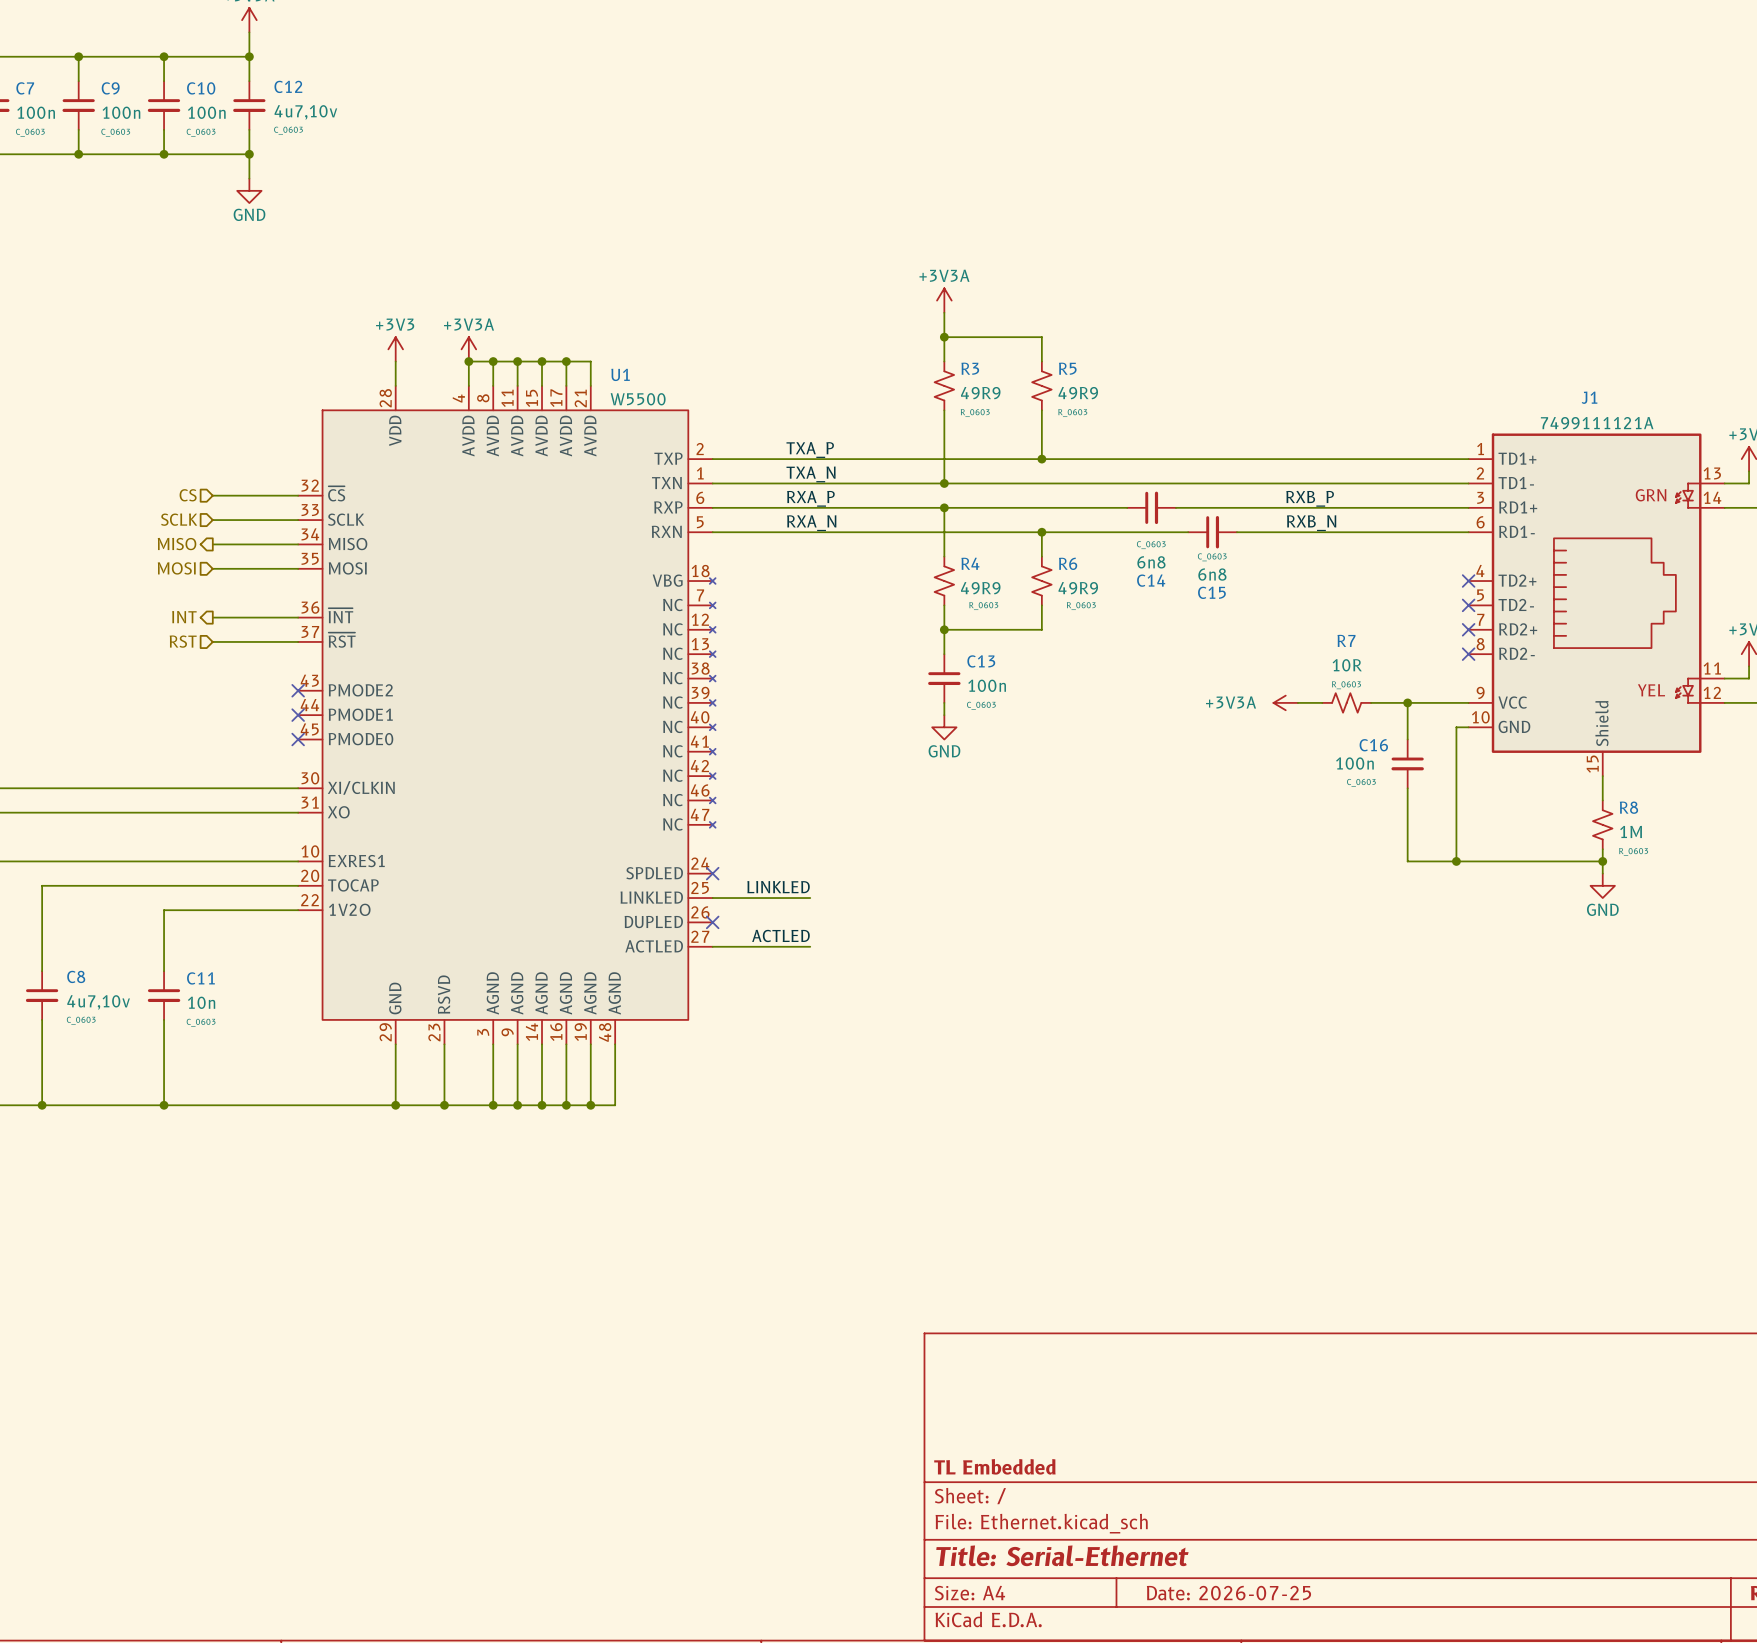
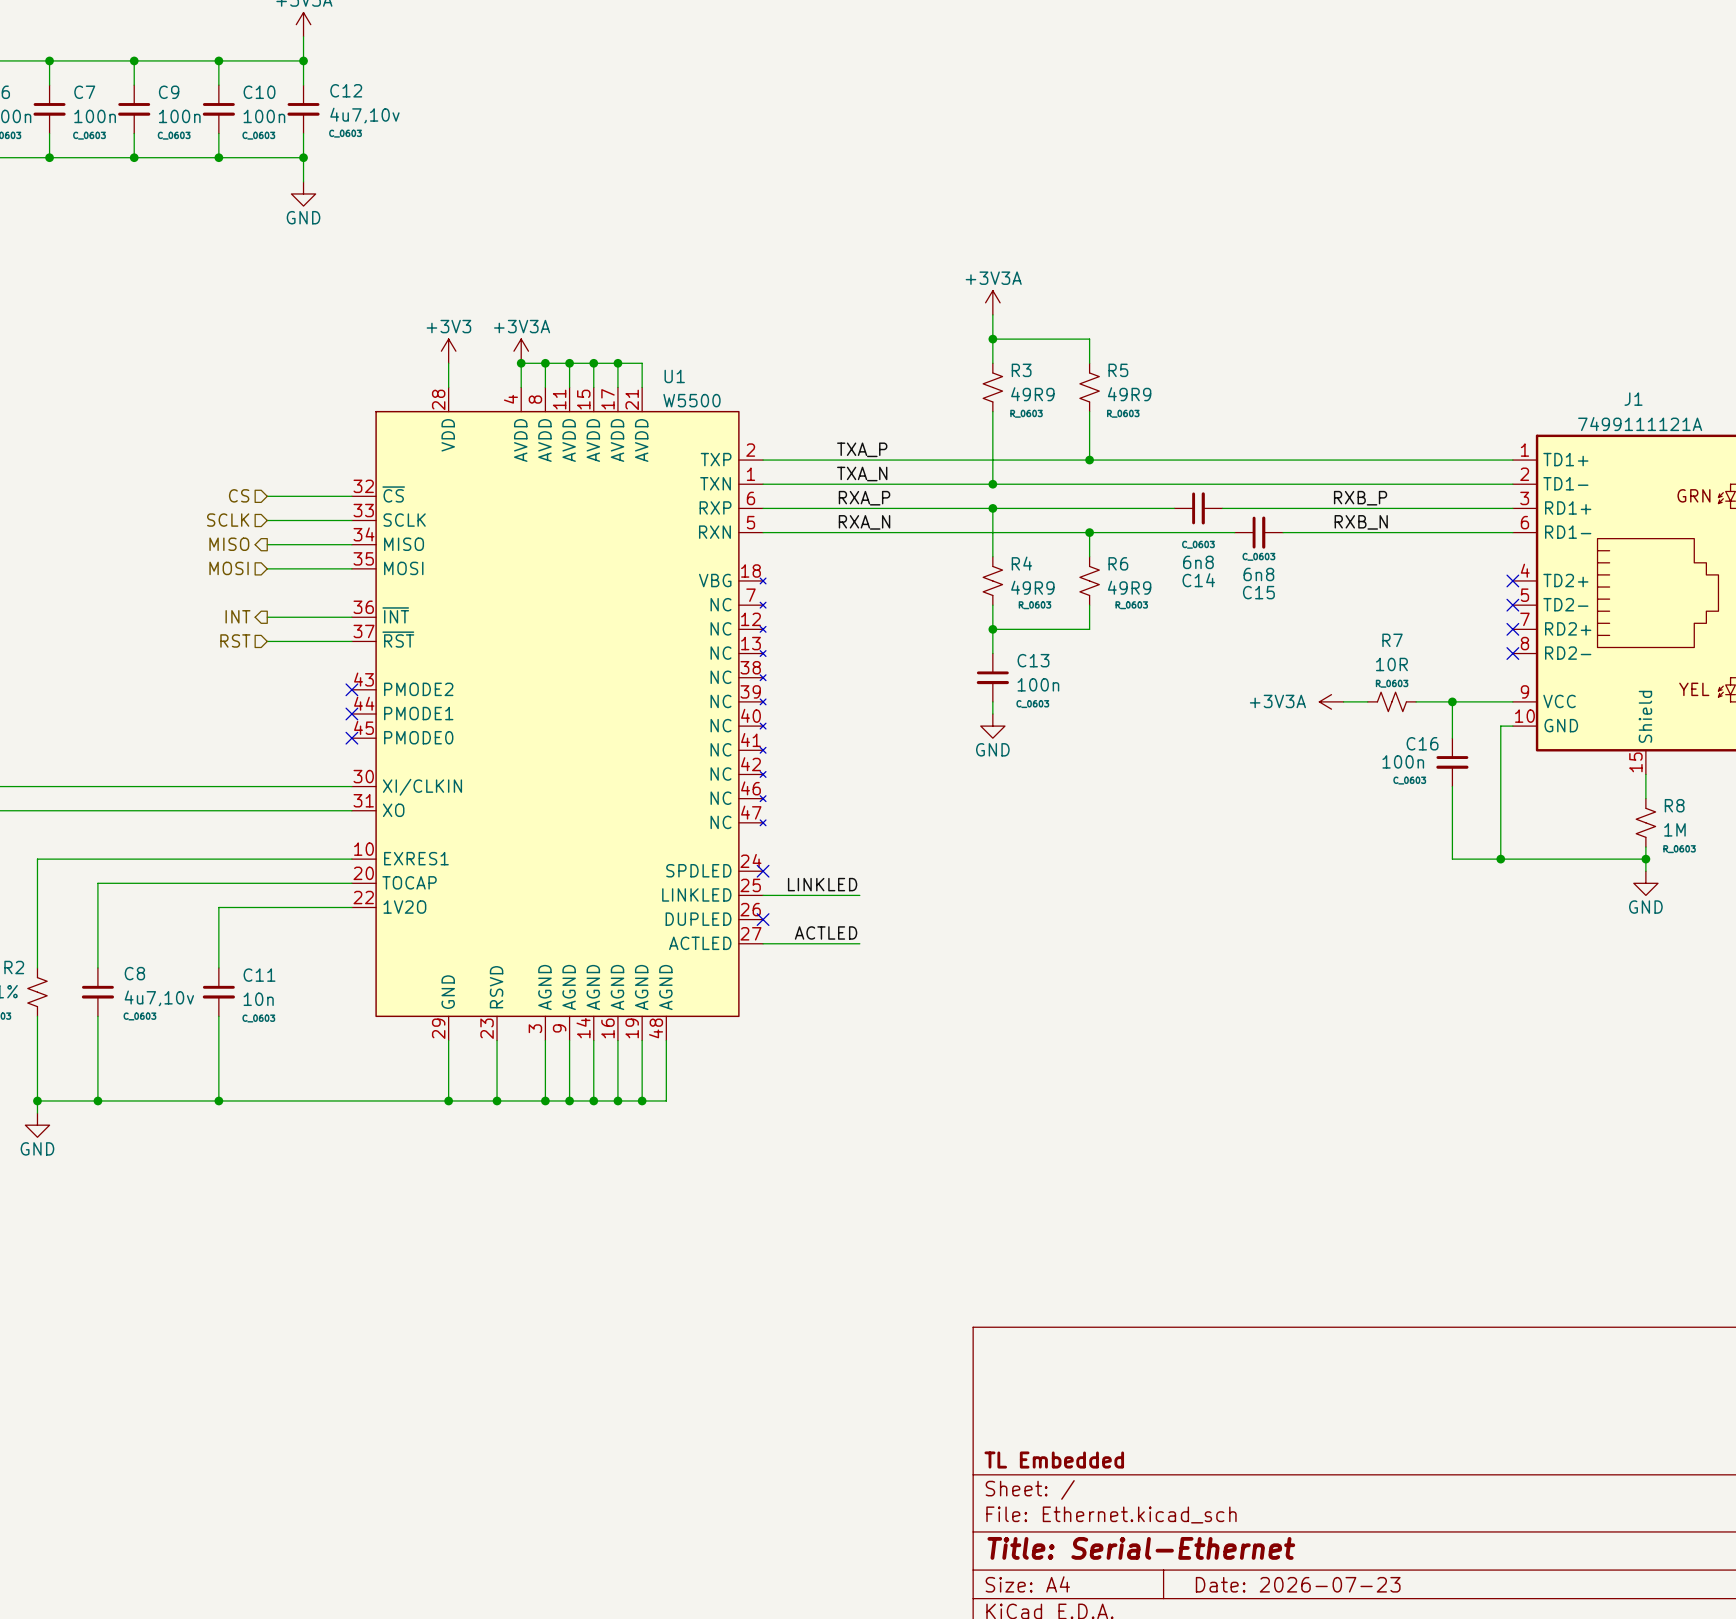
title block: Date: 2026-07-25 (1228, 1593) -> Date: 2026-07-23 (1298, 1584)

